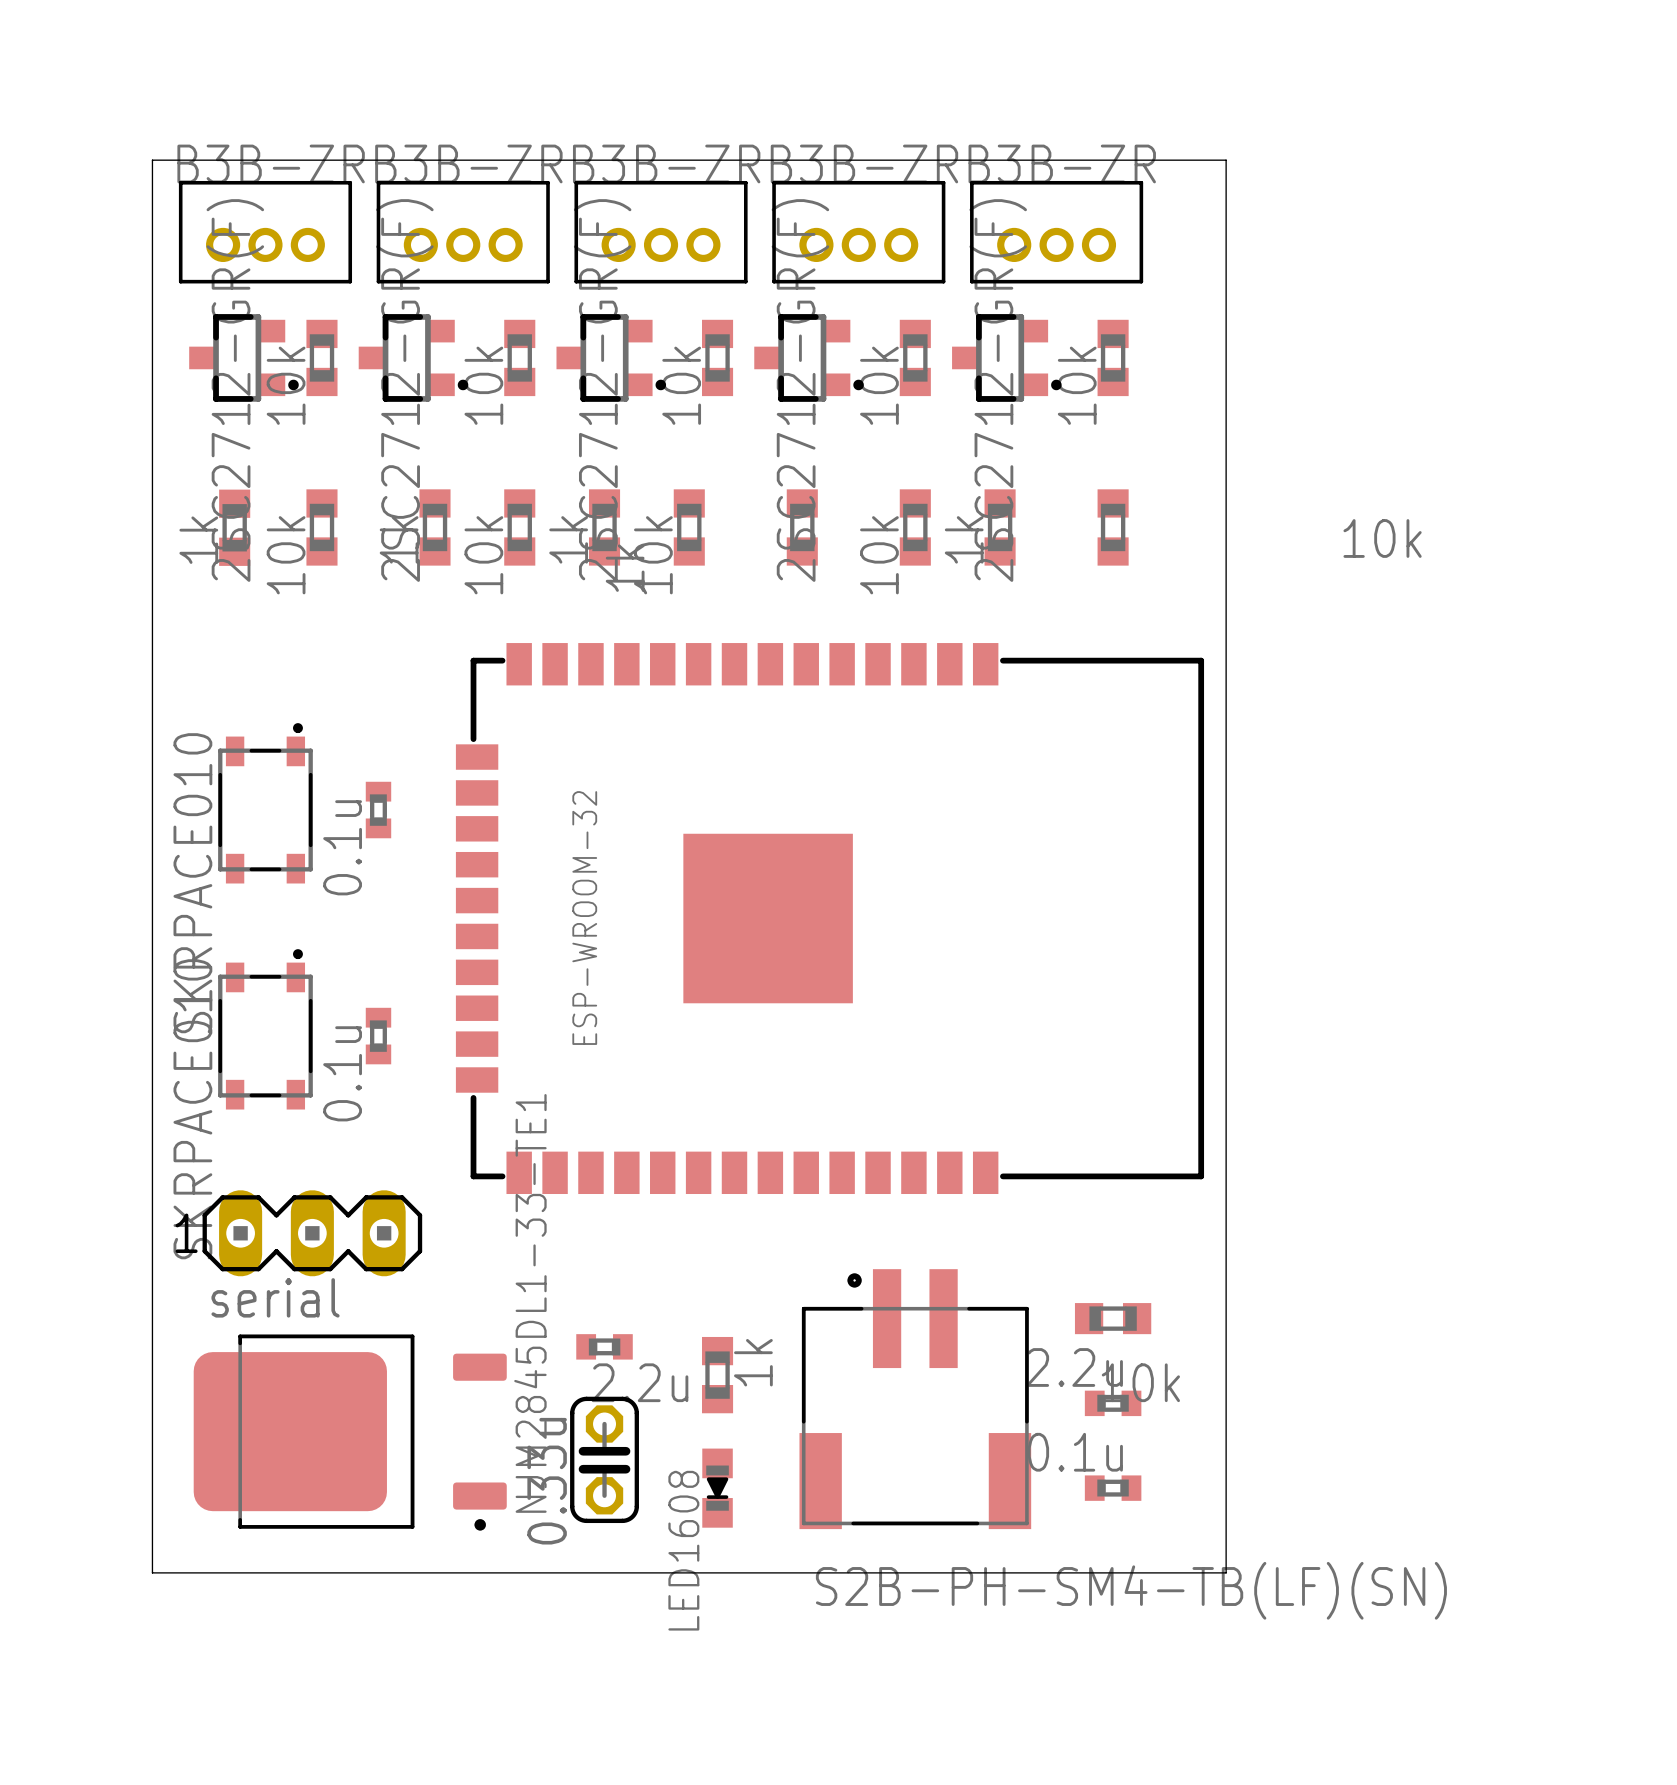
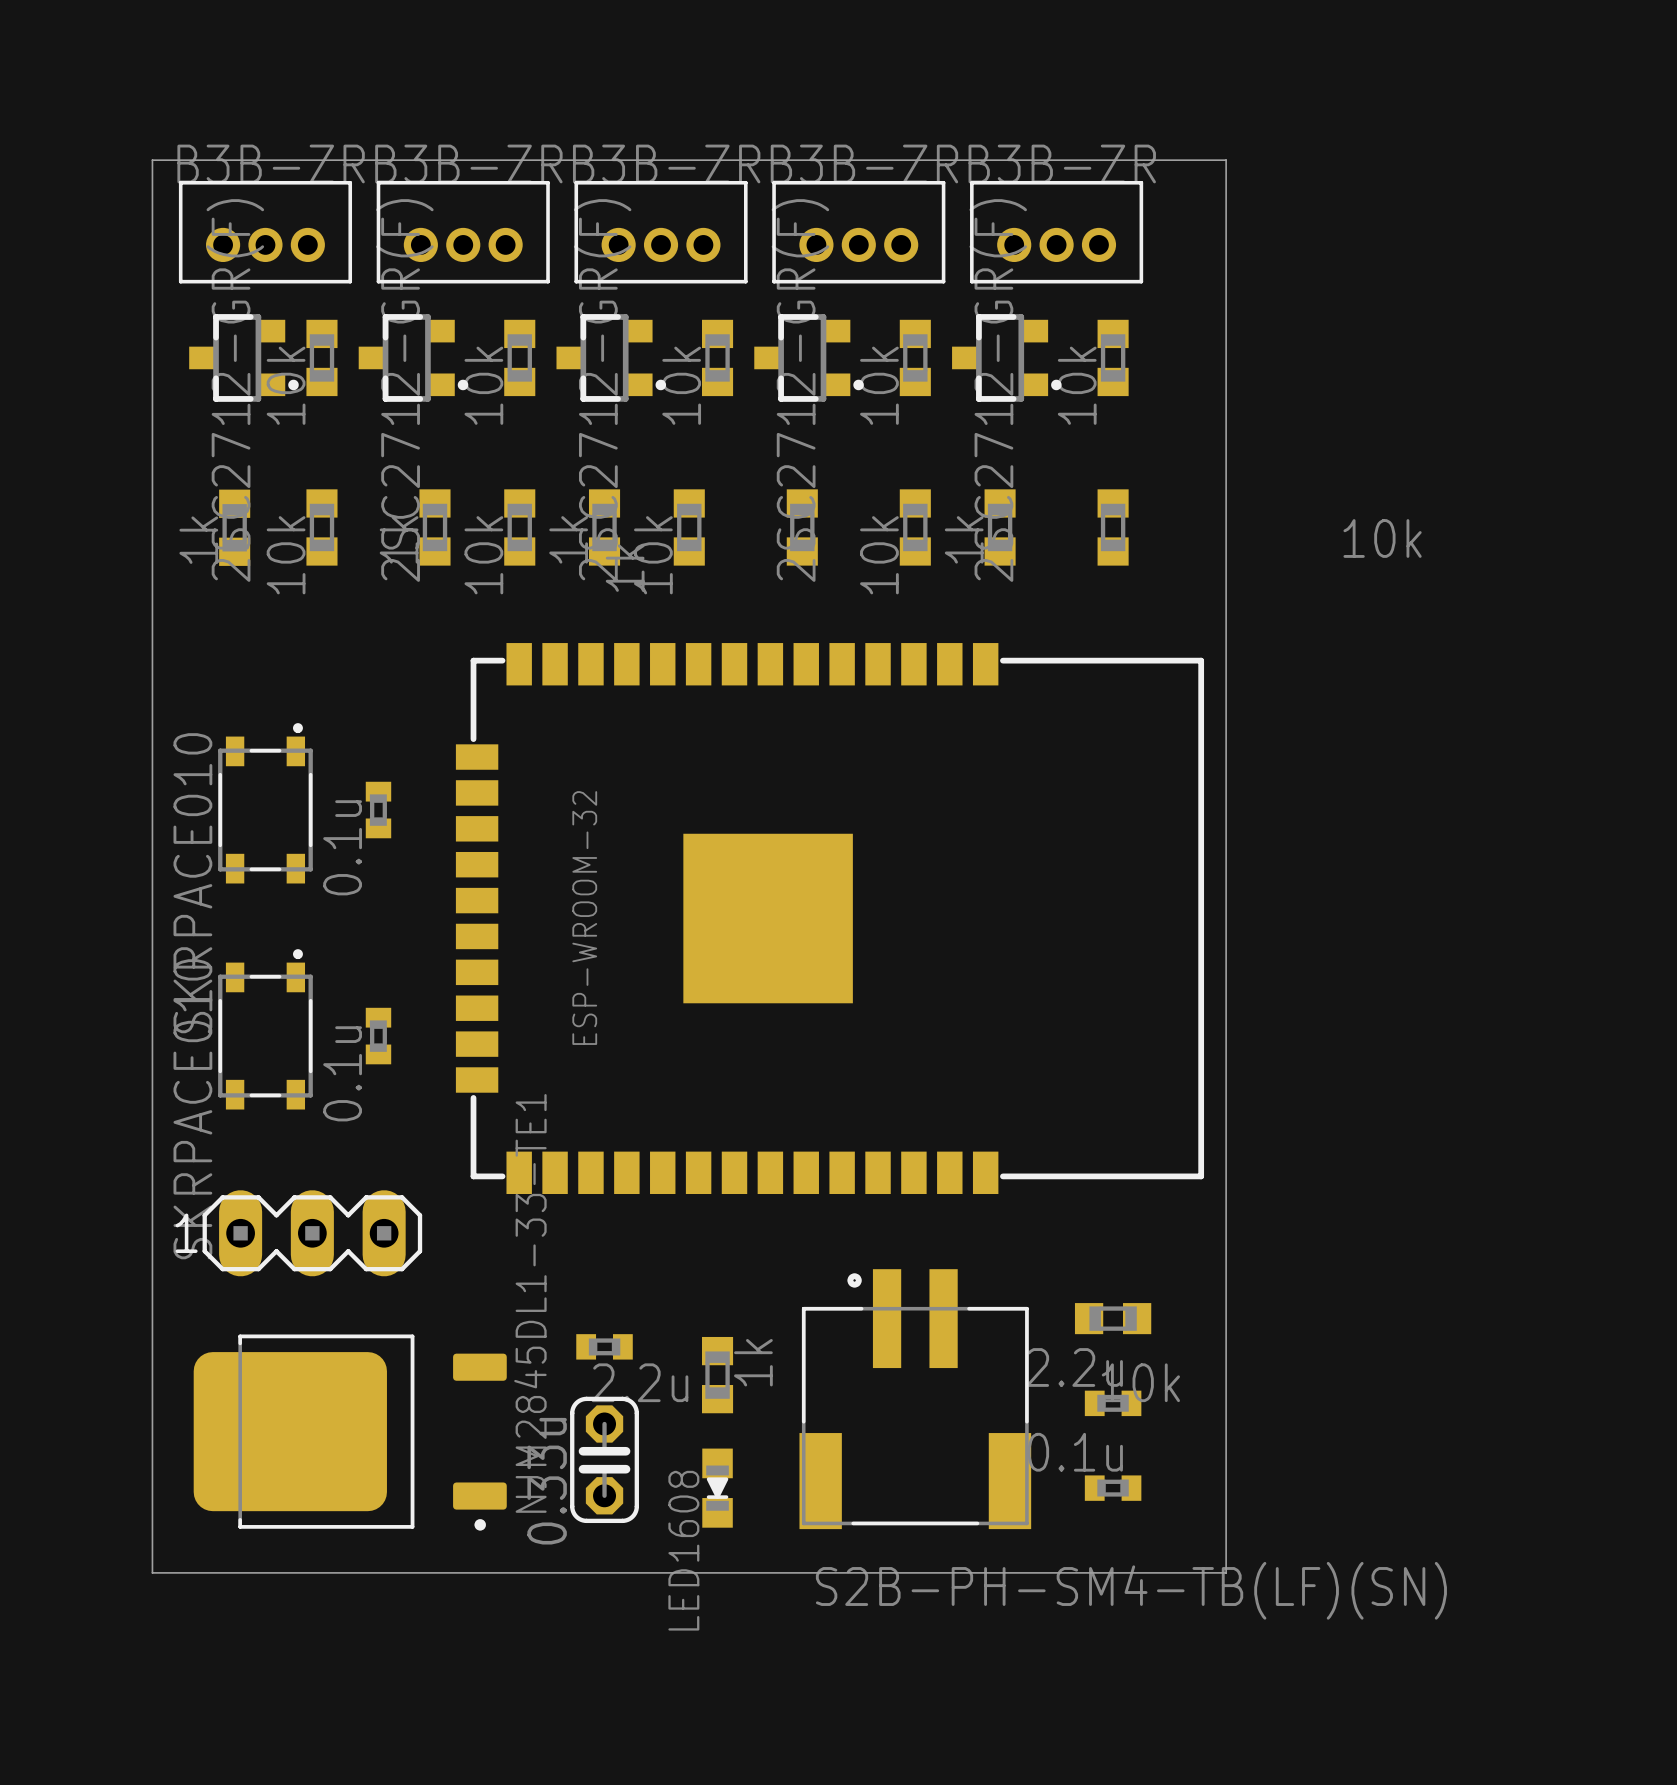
part value: serial (275, 1297) -> none

